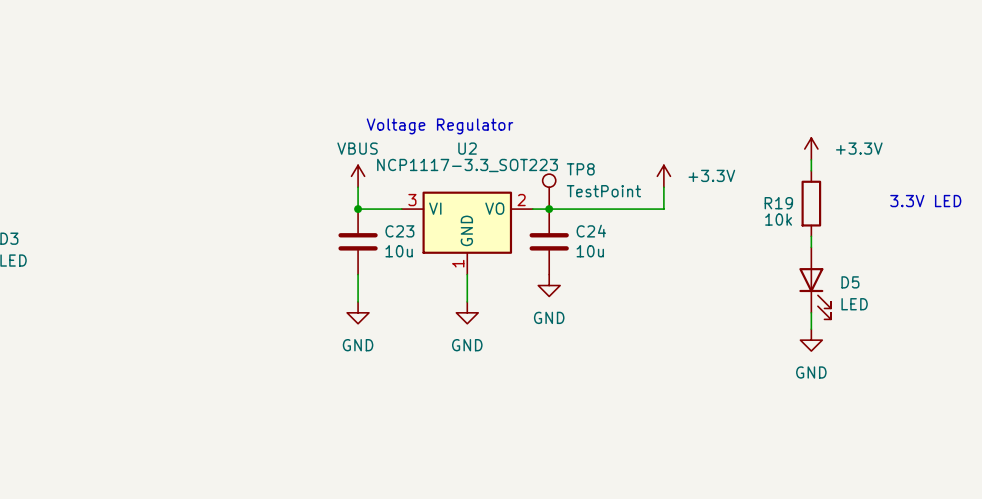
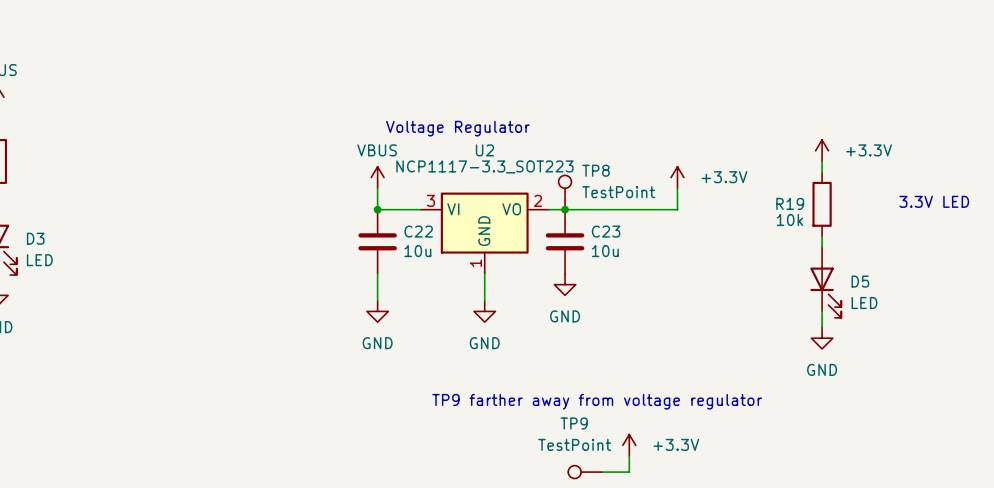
C23 name: C23 (399, 231) -> C22 (418, 231)
C24 name: C24 (591, 231) -> C23 (606, 231)
text: none -> TP9 farther away from voltage regulator (597, 401)
power symbol: none -> +3.3V (629, 445)
wire: none -> (629, 456) (629, 472) (602, 472)
TP9: none -> TestPoint (585, 472)

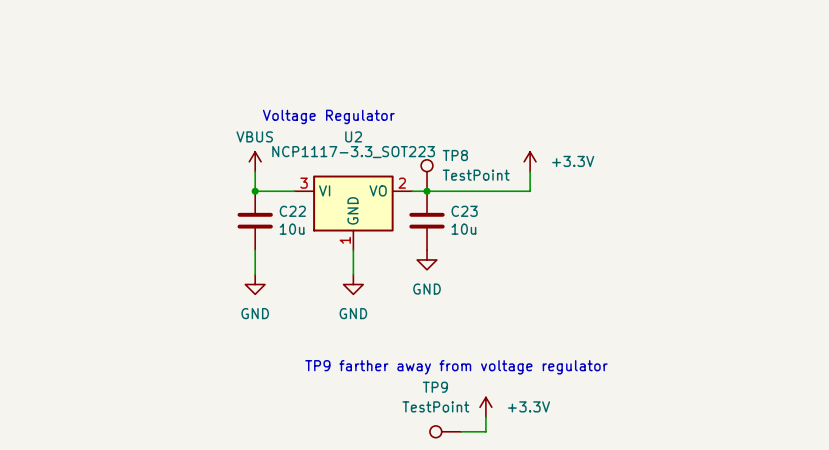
power symbol: +3.3V (822, 150) -> none
wire: (822, 161) (822, 172) -> none
text: 3.3V LED (934, 201) -> none
R19: 10k (822, 204) -> none
wire: (822, 236) (822, 247) -> none
D5: LED (825, 282) -> none
wire: (822, 311) (822, 327) -> none
power symbol: GND (822, 338) -> none

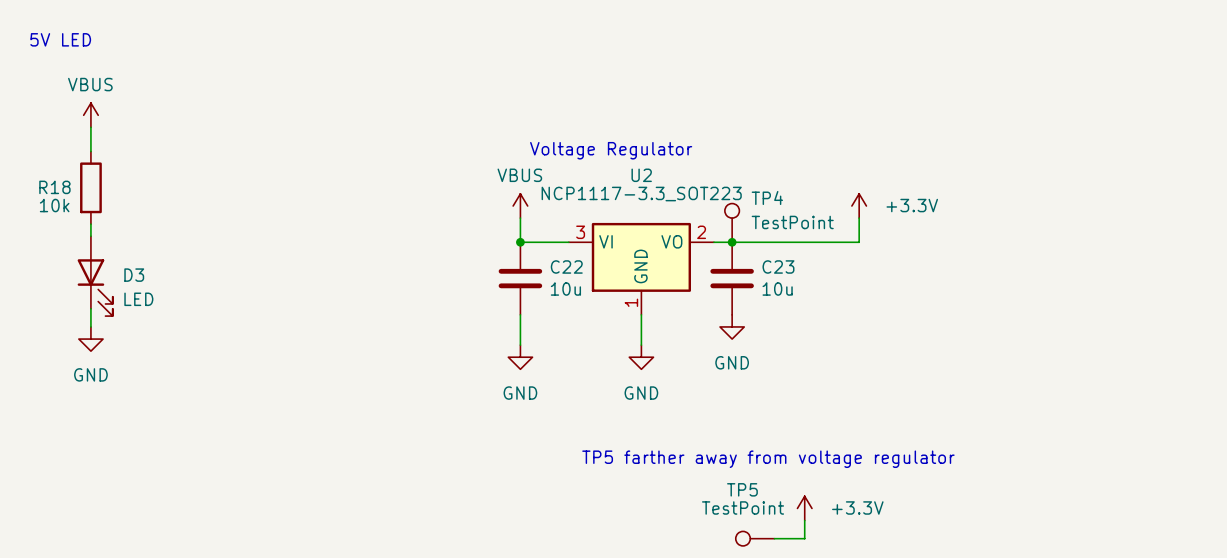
TP8 name: TP8 (455, 155) -> TP4 (767, 197)
text: TP9 farther away from voltage regulator (456, 367) -> TP5 farther away from voltage regulator (768, 459)
TP9 name: TP9 (435, 387) -> TP5 (742, 489)

